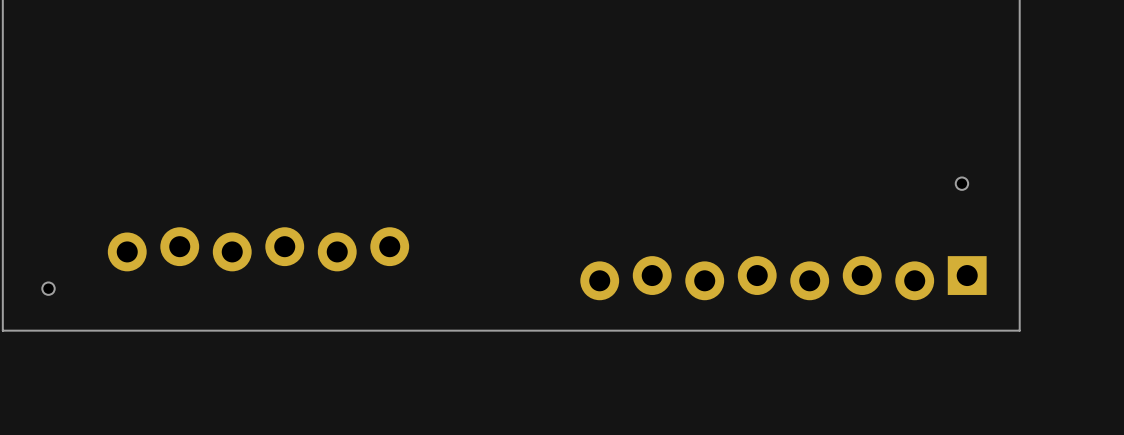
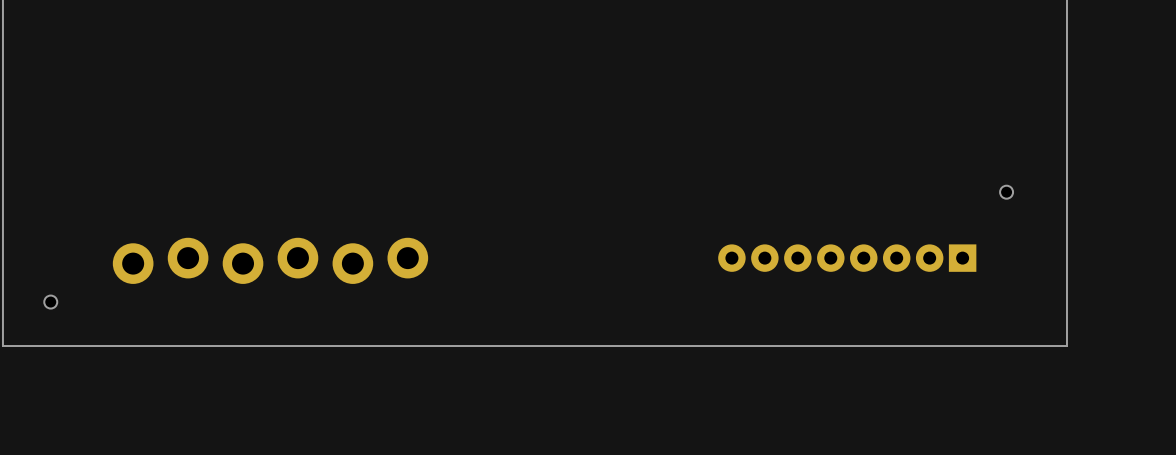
part: none -> (847, 258)
part: (783, 278) -> none

